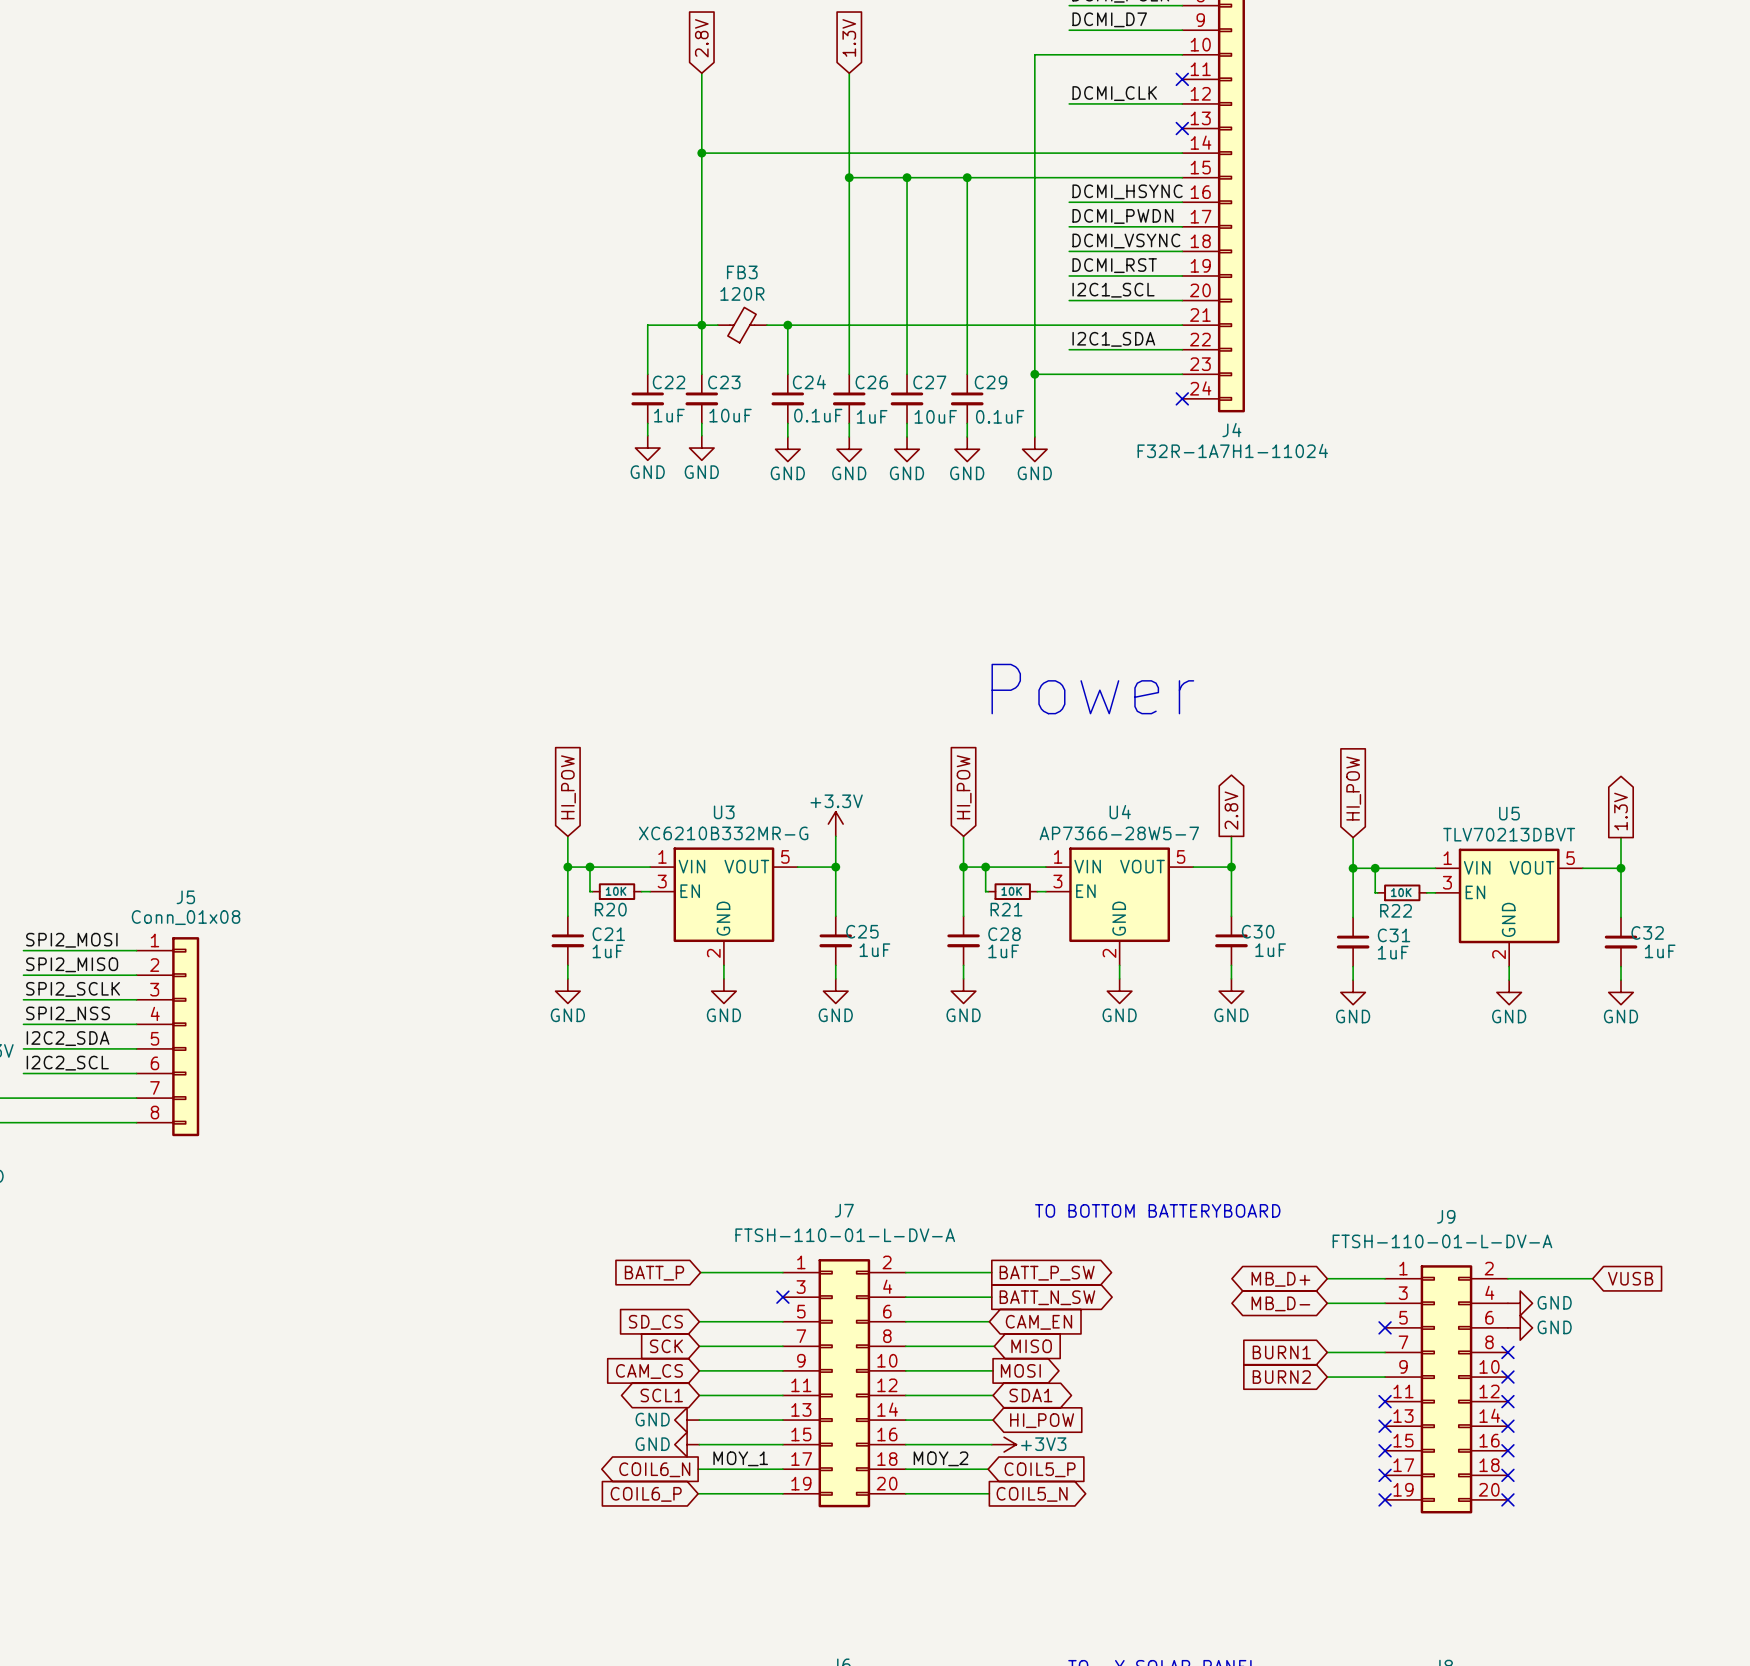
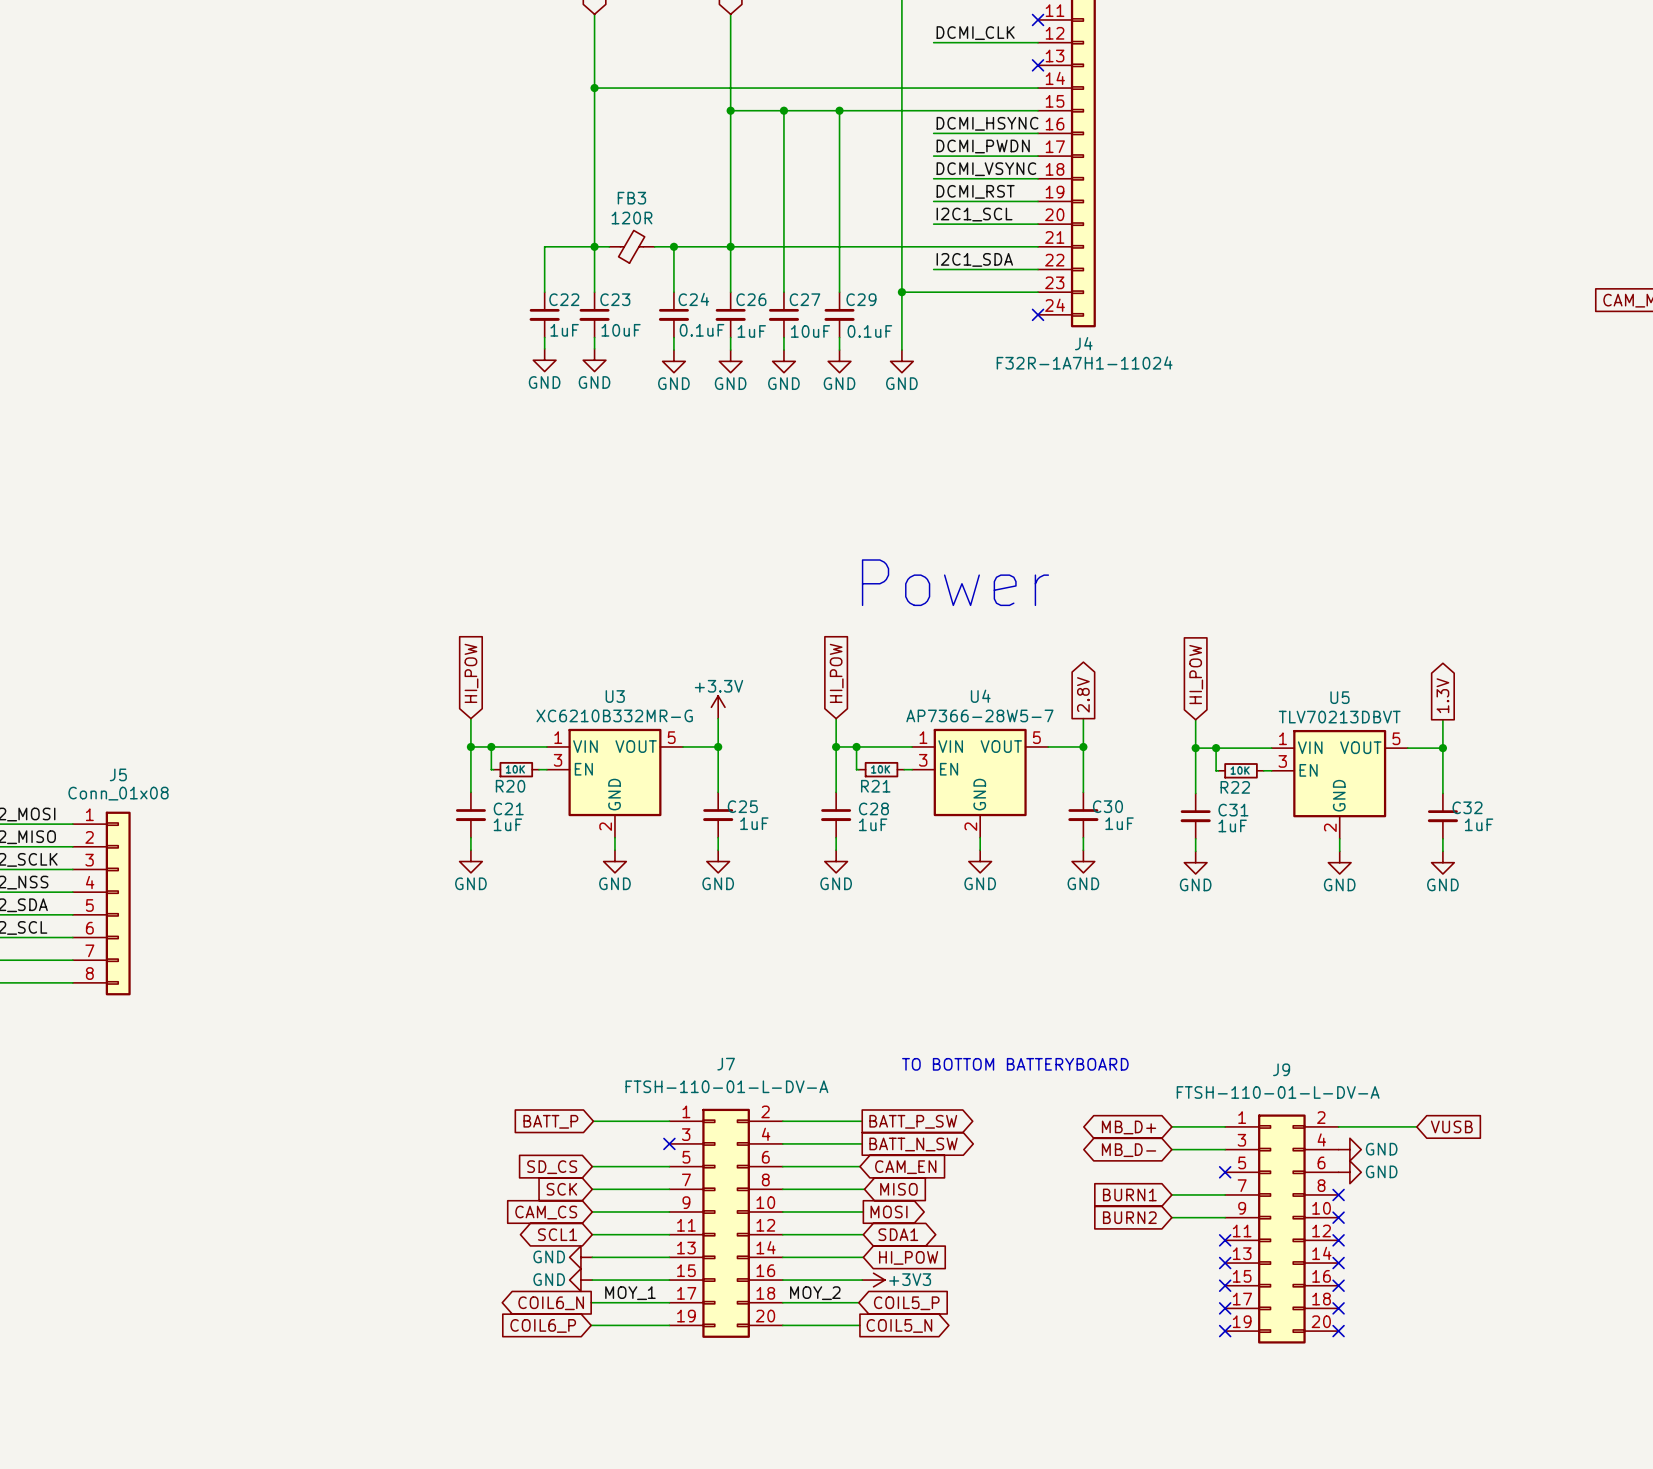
junction: none -> (730, 246)

